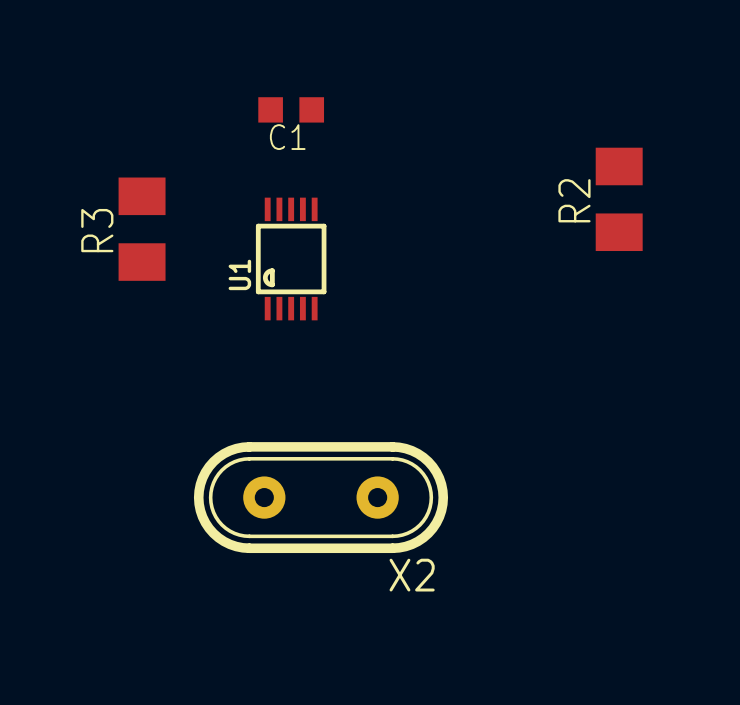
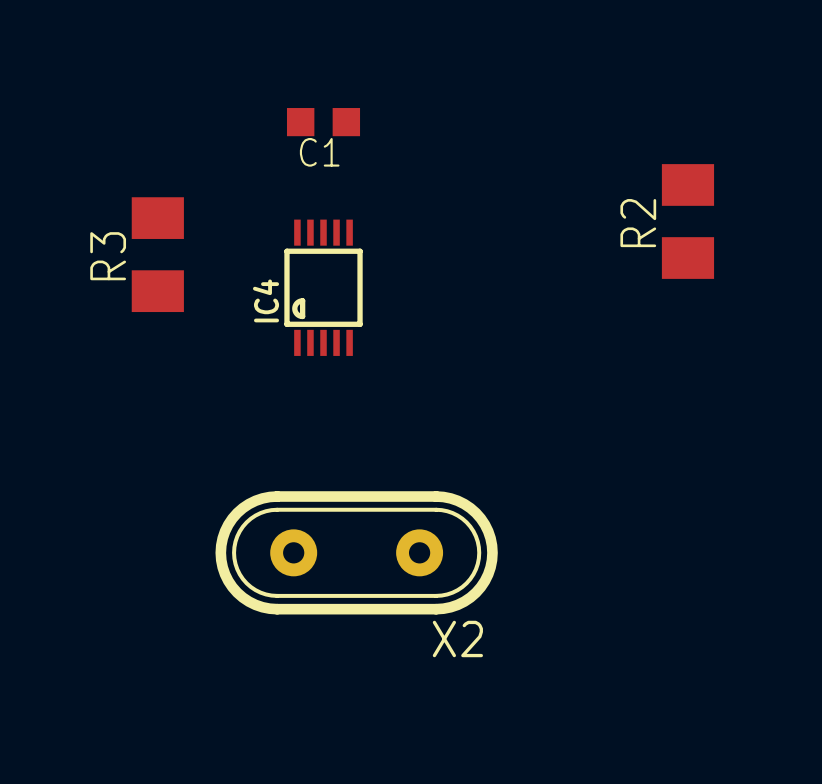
U1 name: U1 (239, 274) -> IC4 (266, 300)

